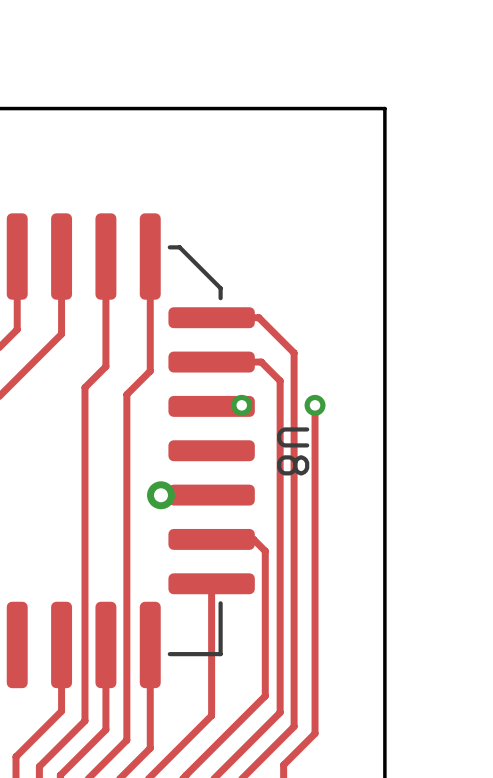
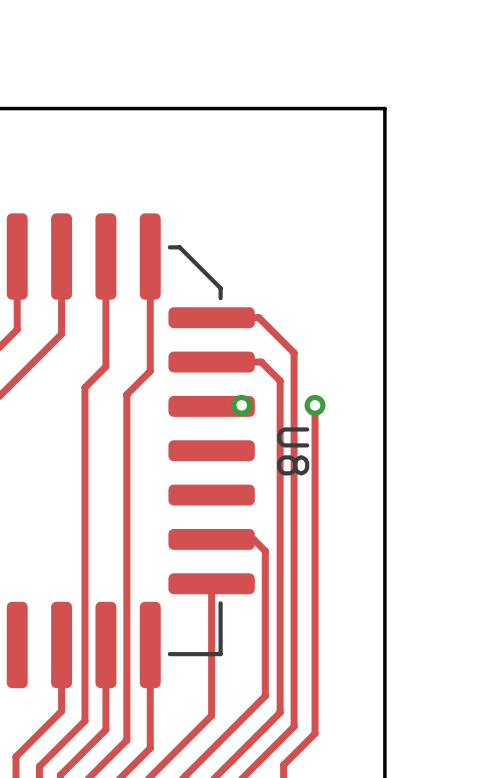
via: (160, 495) -> none

